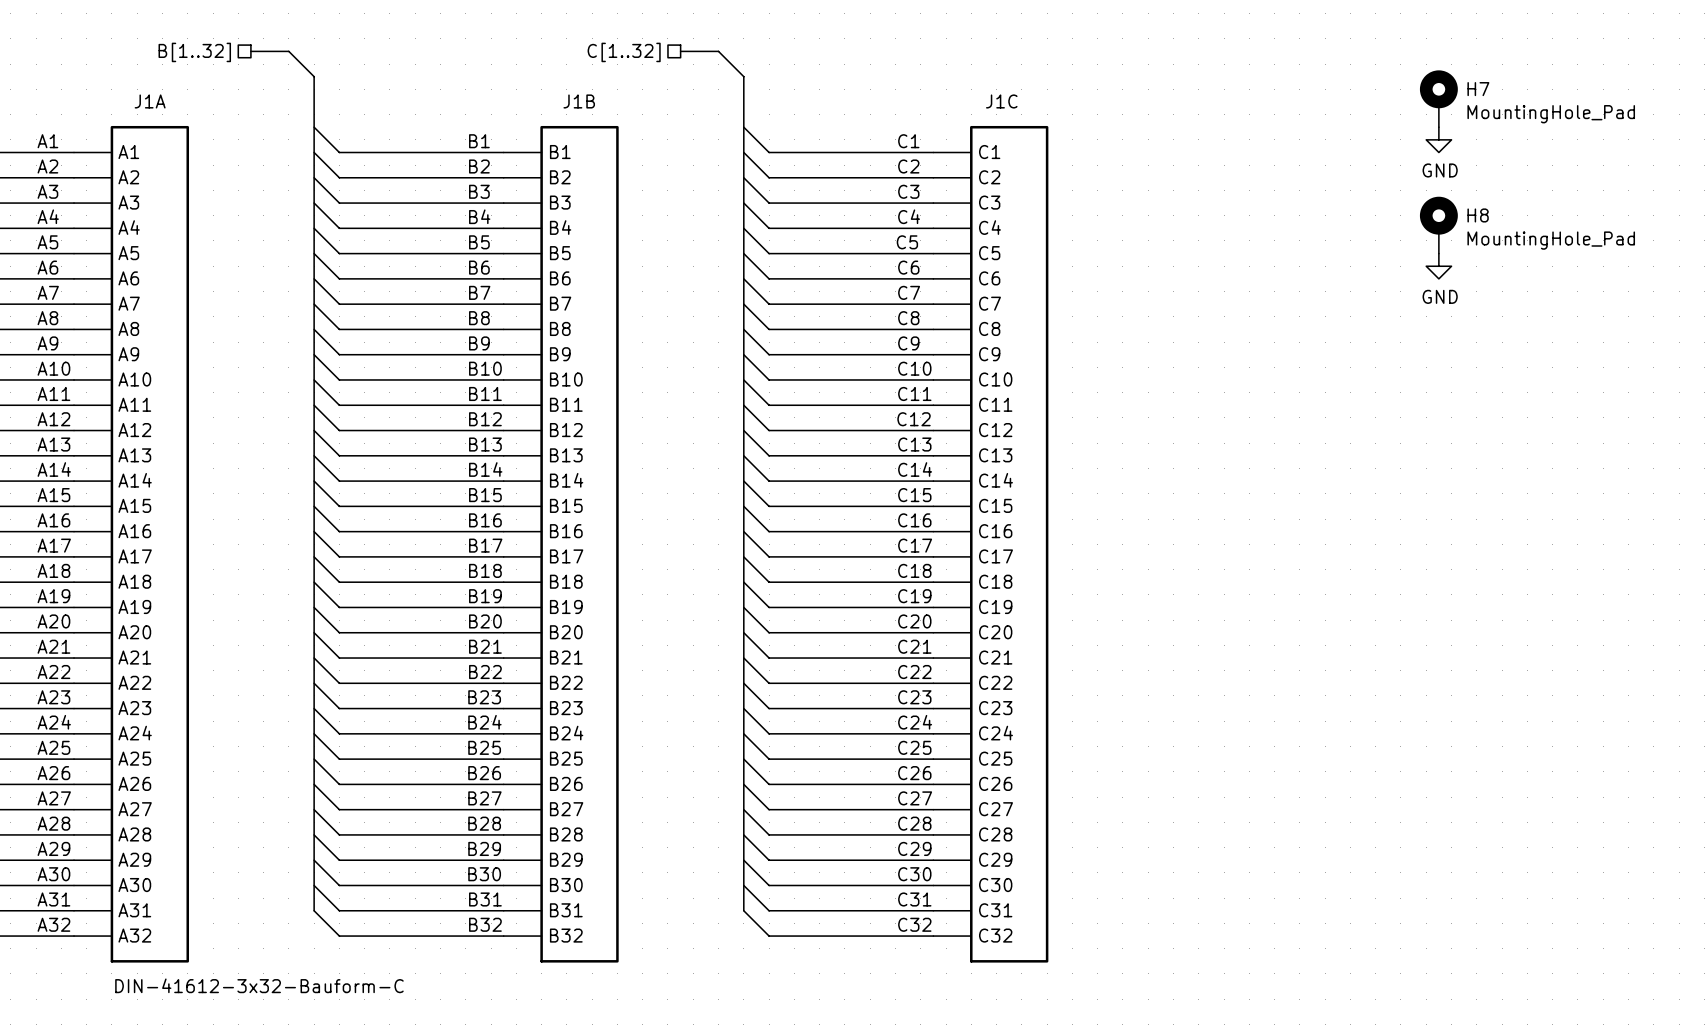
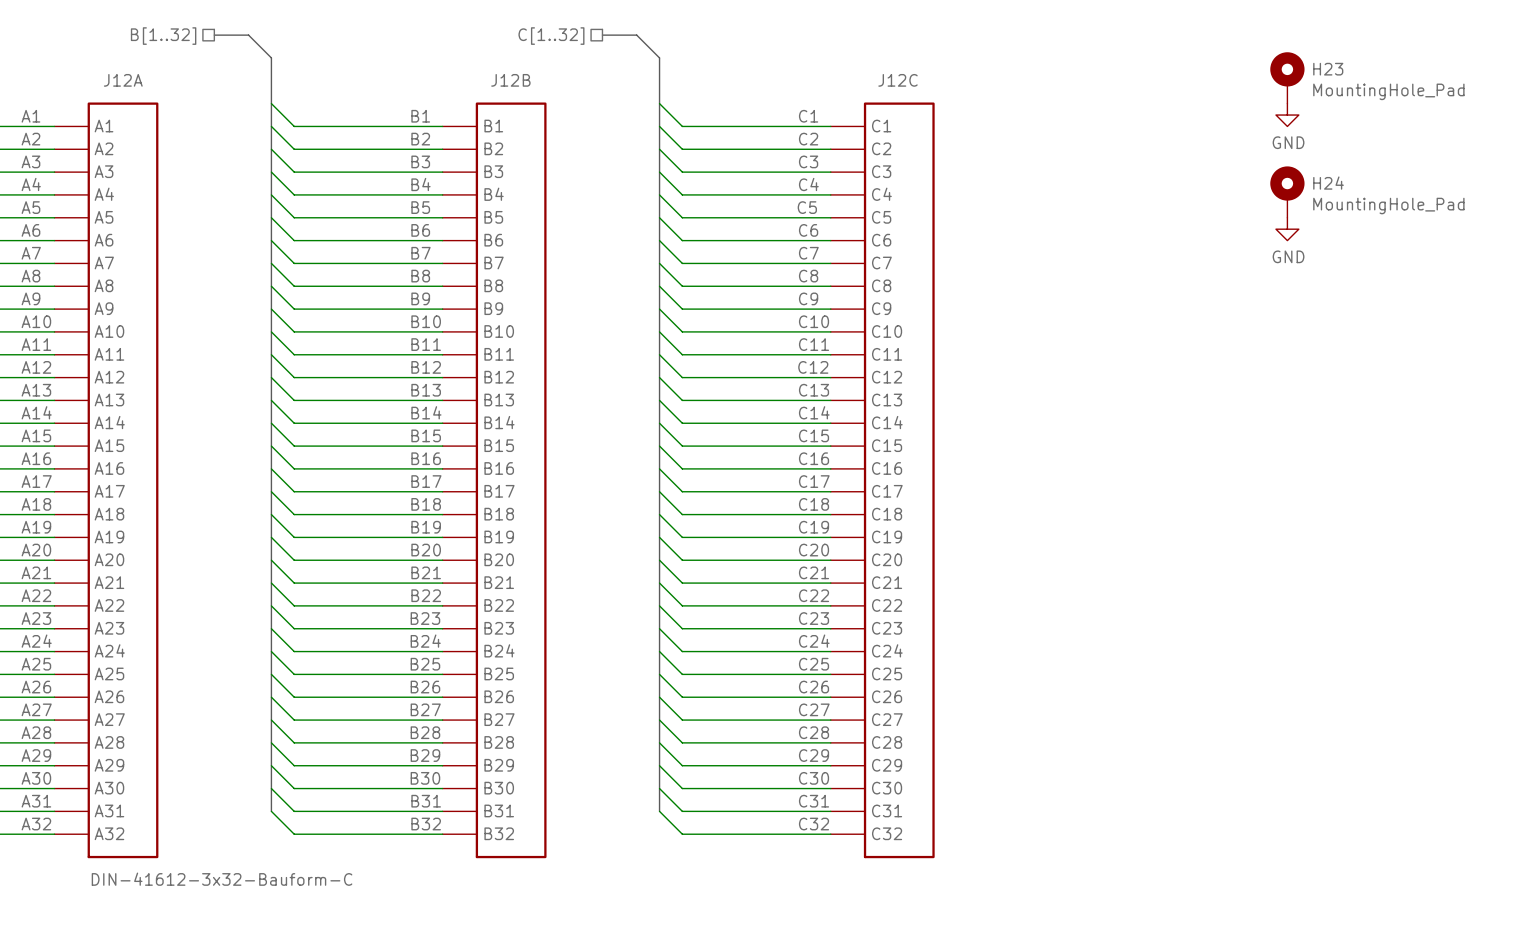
H7 name: H7 (1478, 89) -> H23 (1328, 69)
J1A name: J1A (150, 101) -> J12A (123, 80)
J1B name: J1B (579, 101) -> J12B (510, 80)
J1C name: J1C (1001, 101) -> J12C (898, 80)
H8 name: H8 (1478, 215) -> H24 (1328, 183)

